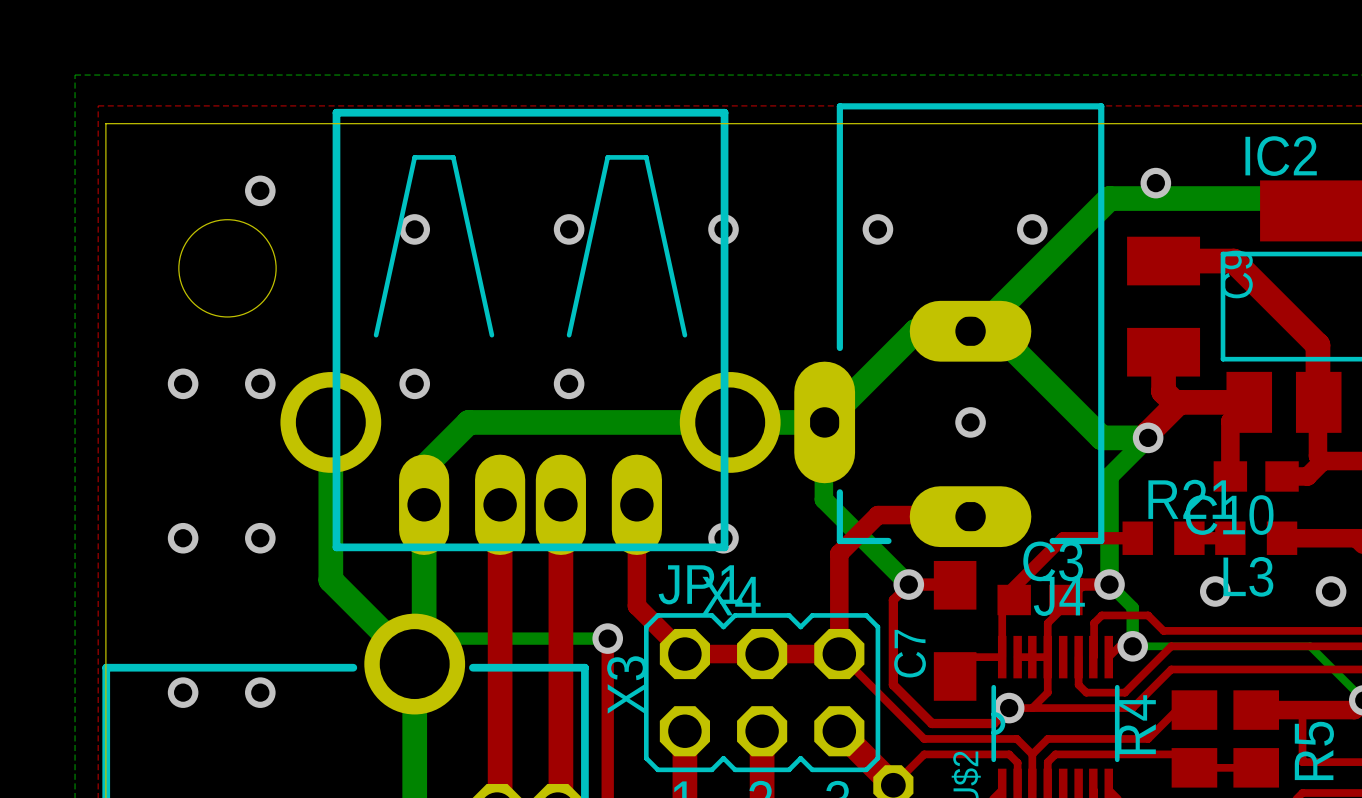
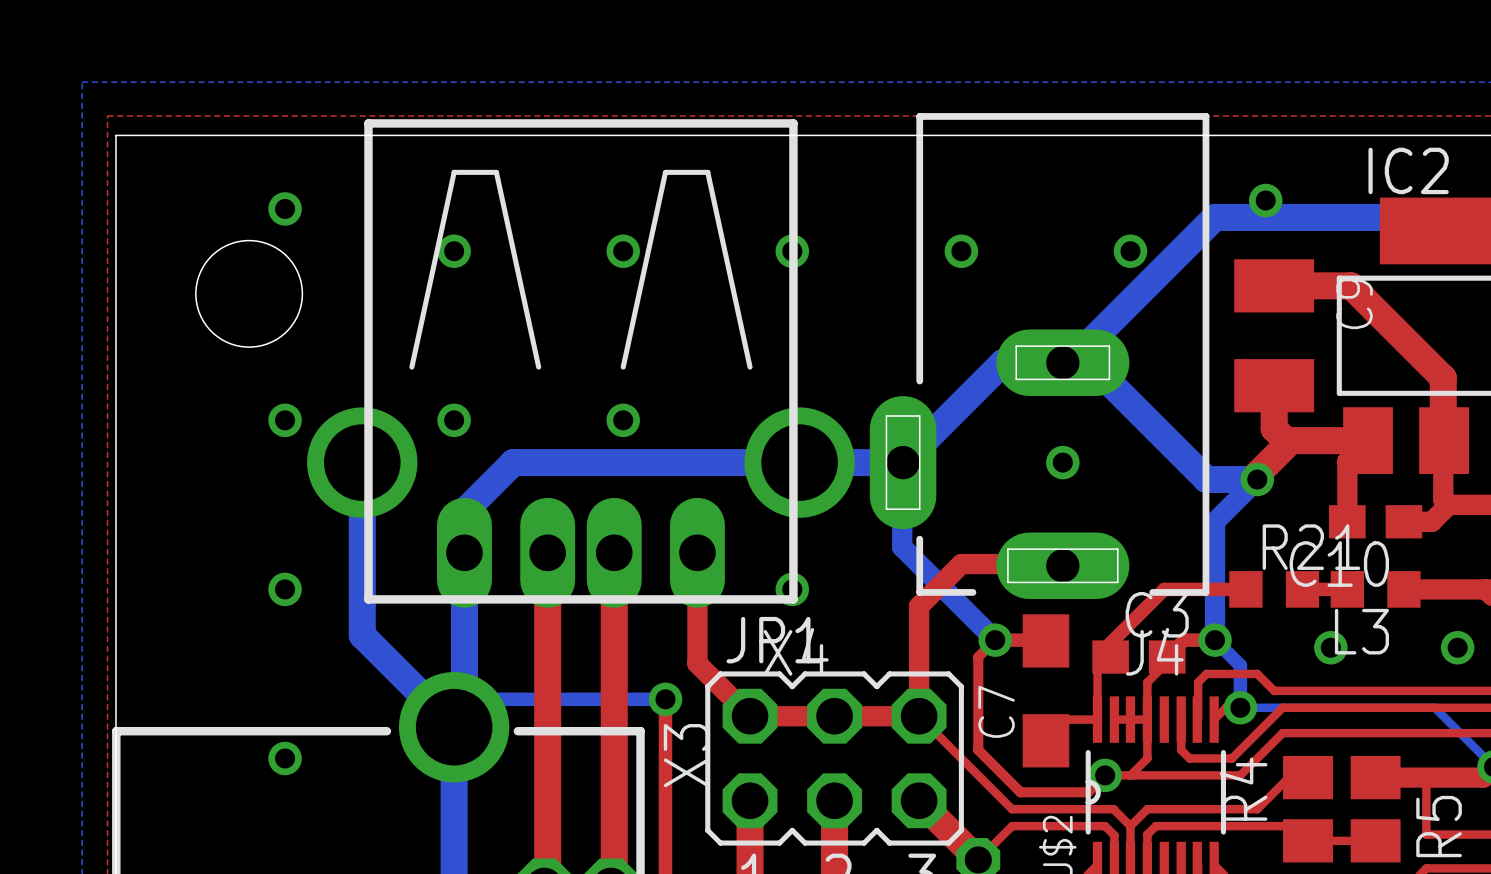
via: (183, 383) -> none
via: (183, 538) -> none
via: (183, 692) -> none

